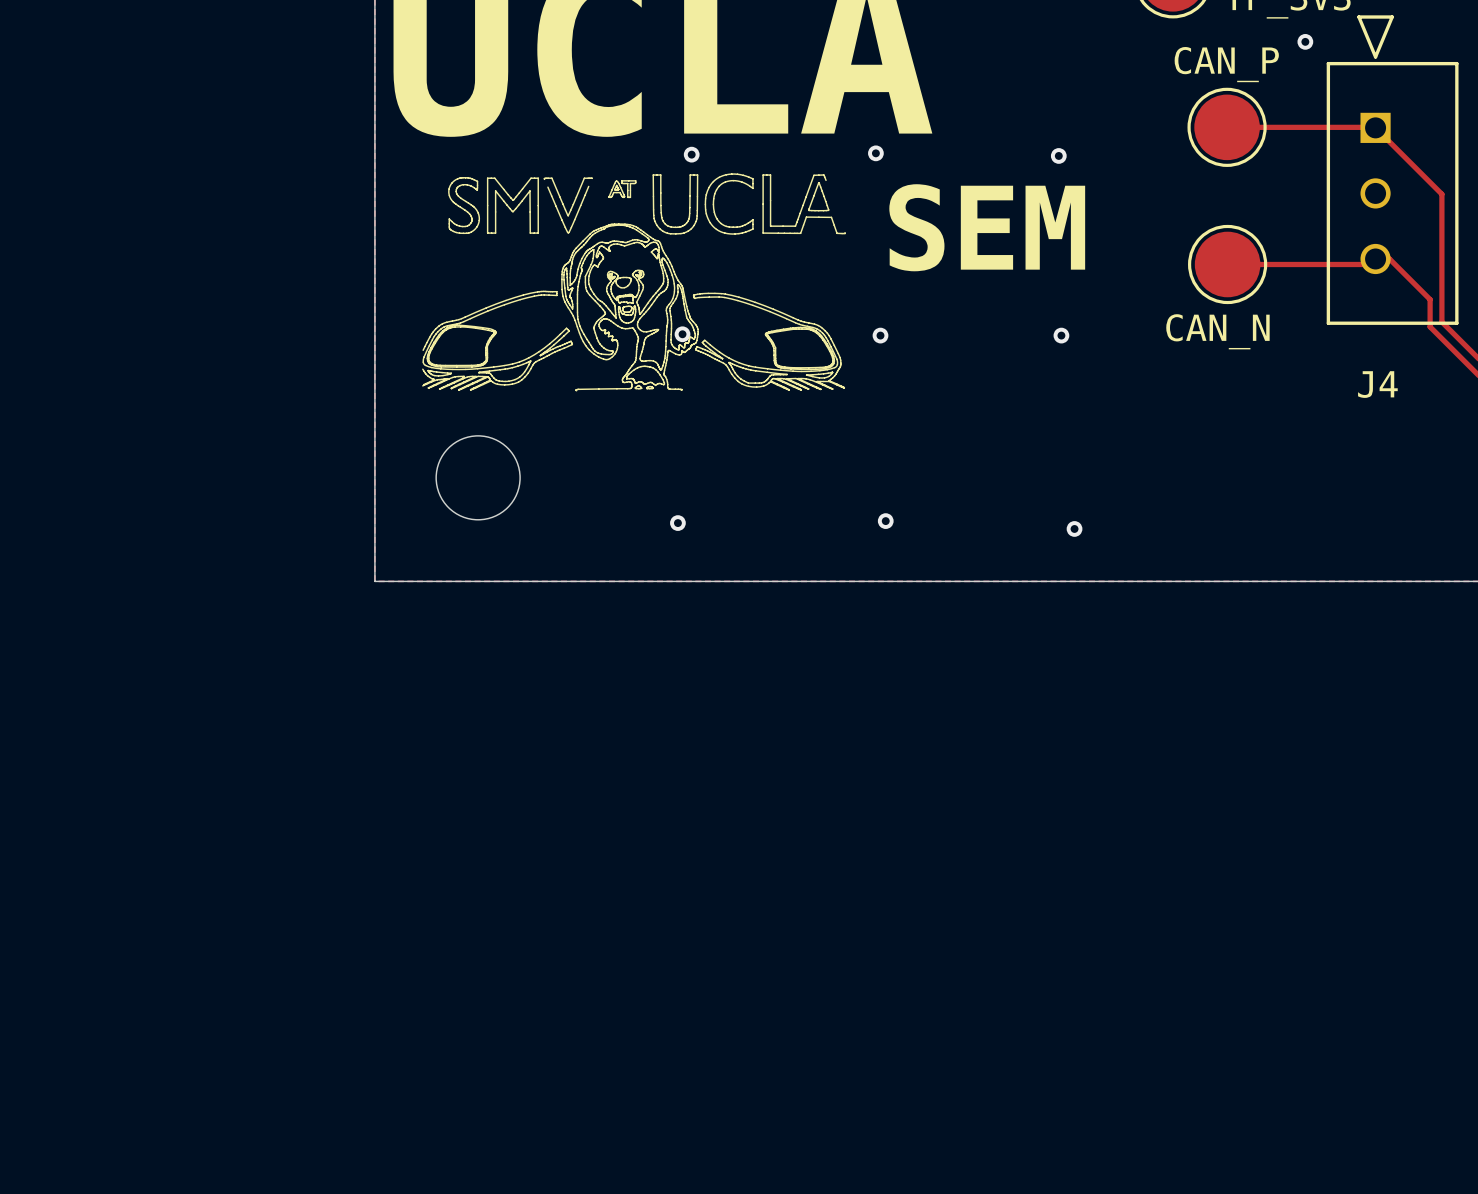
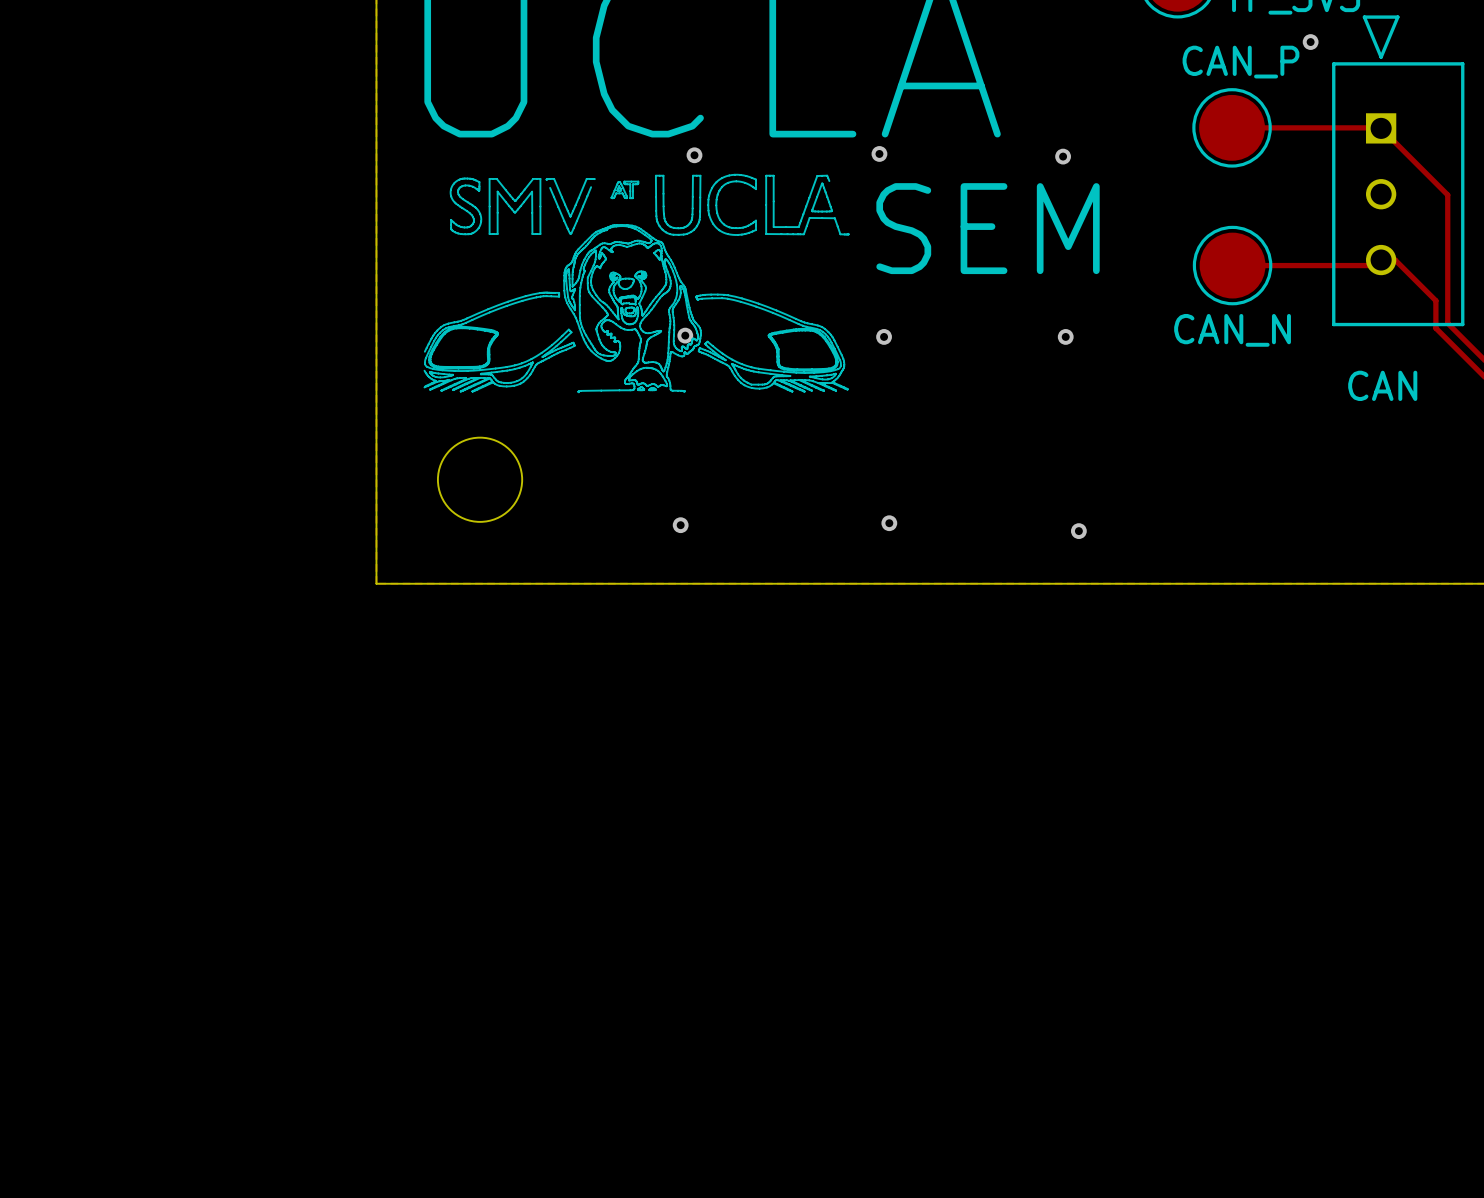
J4 name: J4 (1377, 384) -> CAN (1382, 385)

